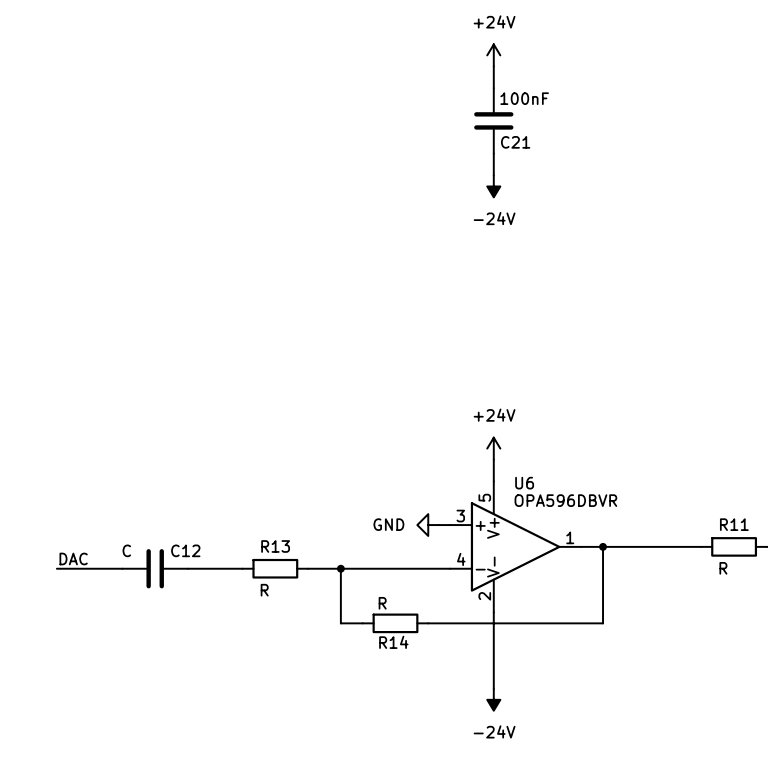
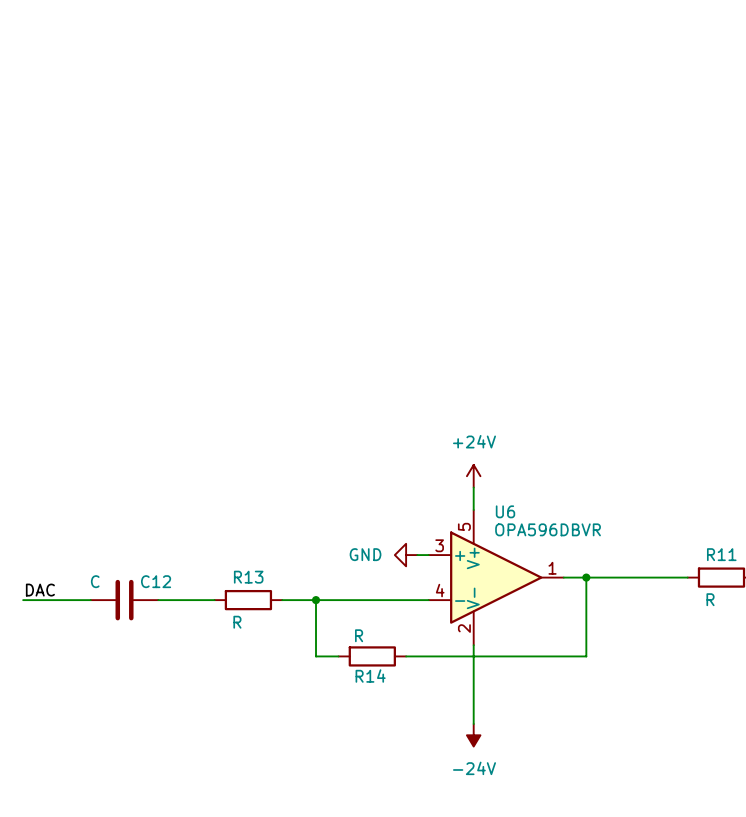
power symbol: +24V (493, 55) -> none
wire: (493, 66) (493, 88) -> none
C21: 100nF (493, 120) -> none
wire: (493, 153) (493, 175) -> none
power symbol: -24V (493, 186) -> none

